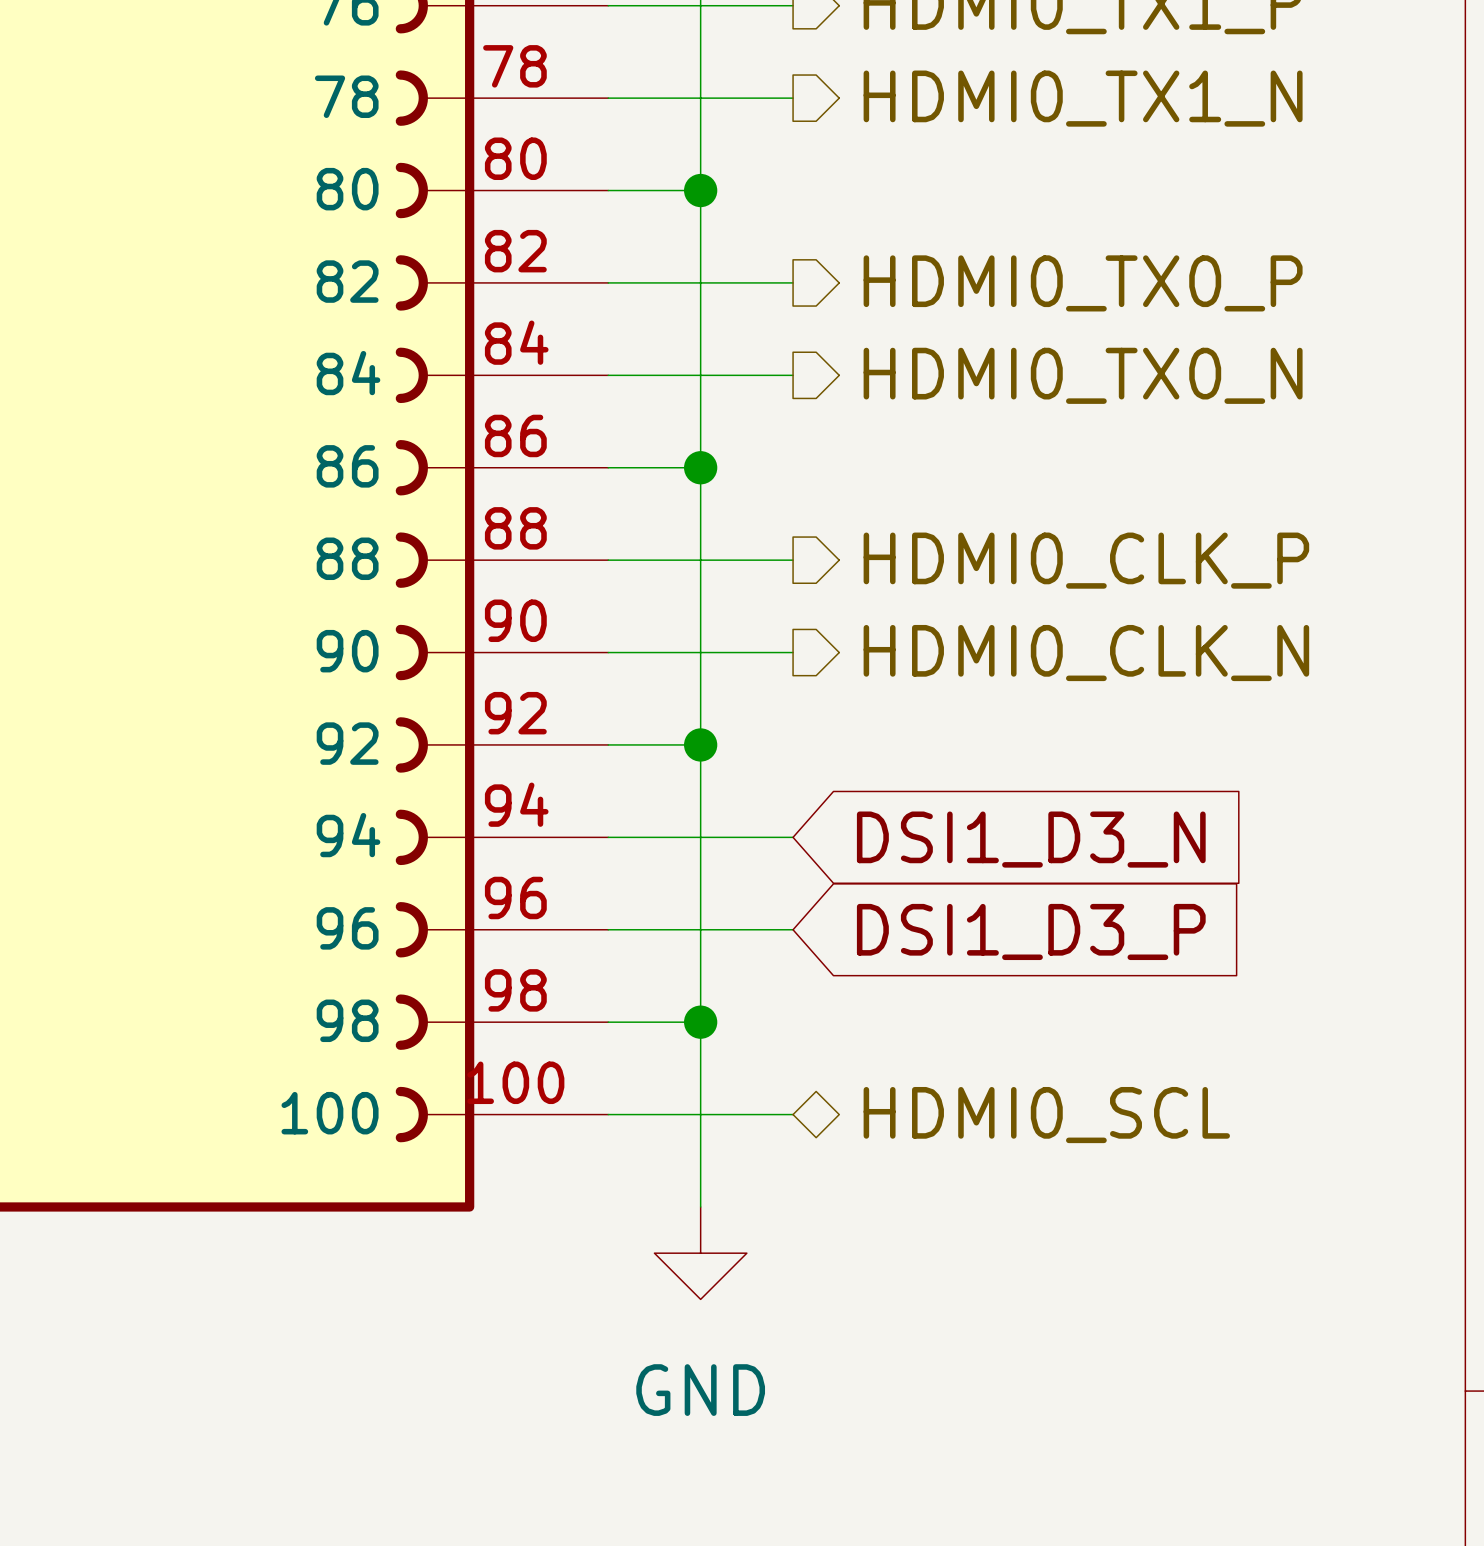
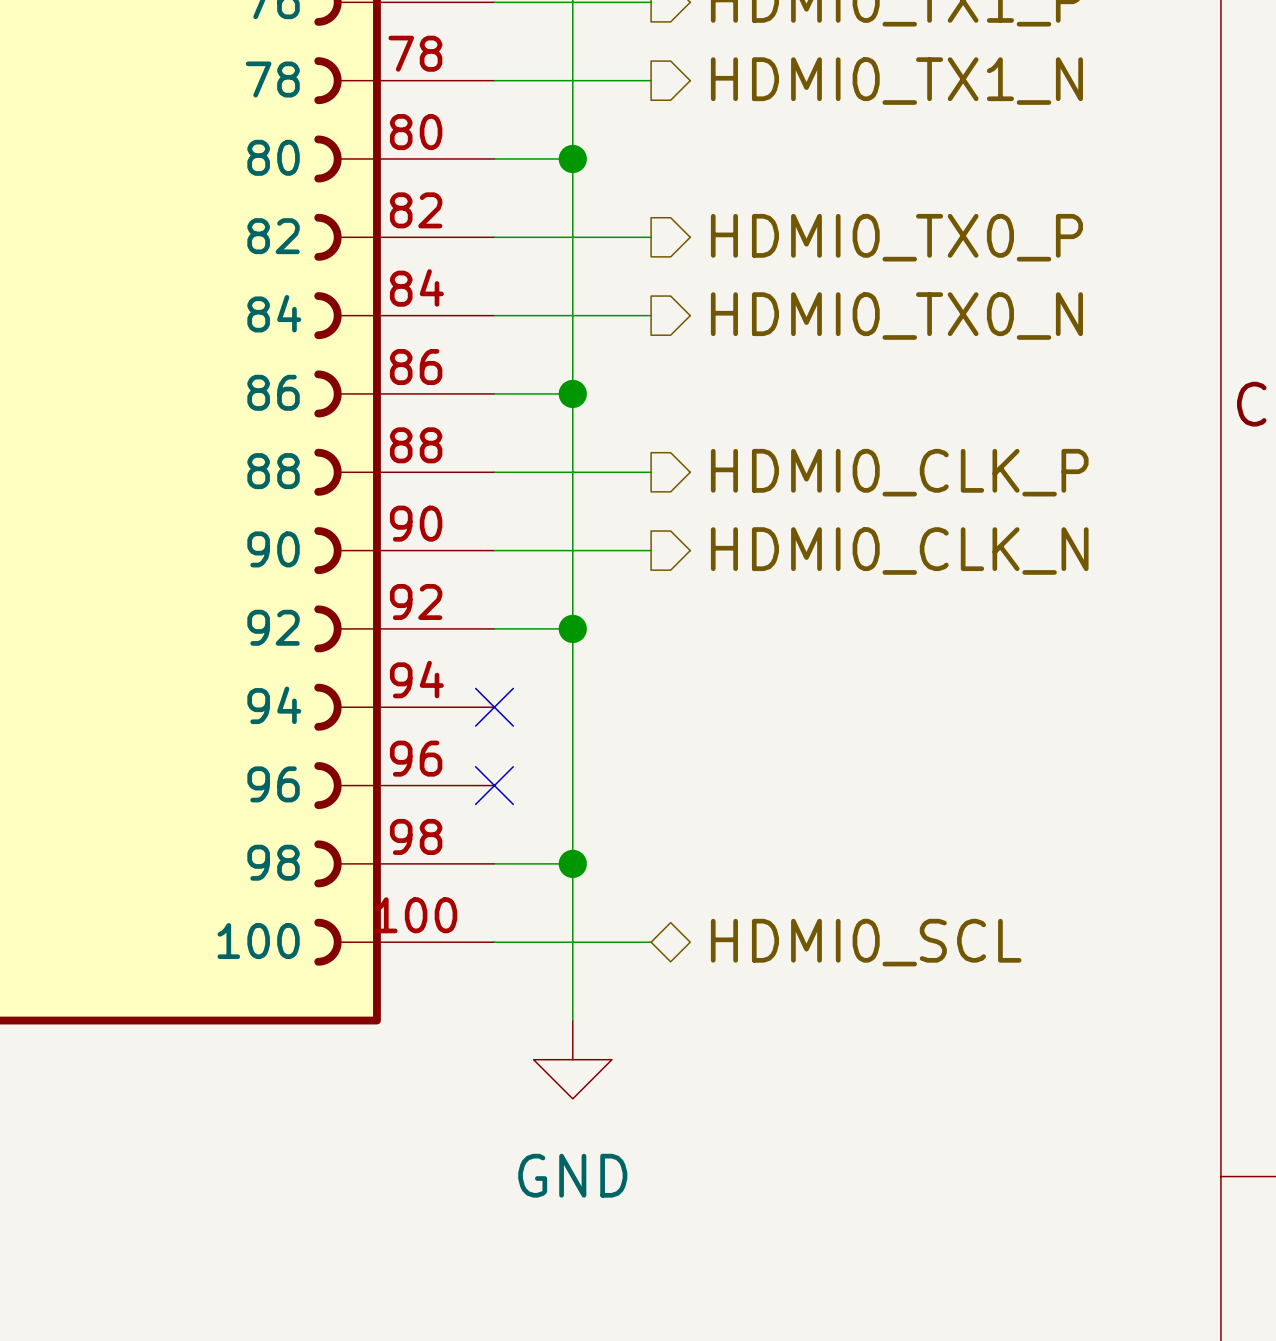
wire: (608, 837) (793, 837) -> none
no-connect mark: none -> (494, 707)
global label: DSI1_D3_N (1031, 839) -> none
wire: (608, 929) (793, 929) -> none
no-connect mark: none -> (494, 785)
global label: DSI1_D3_P (1031, 931) -> none

